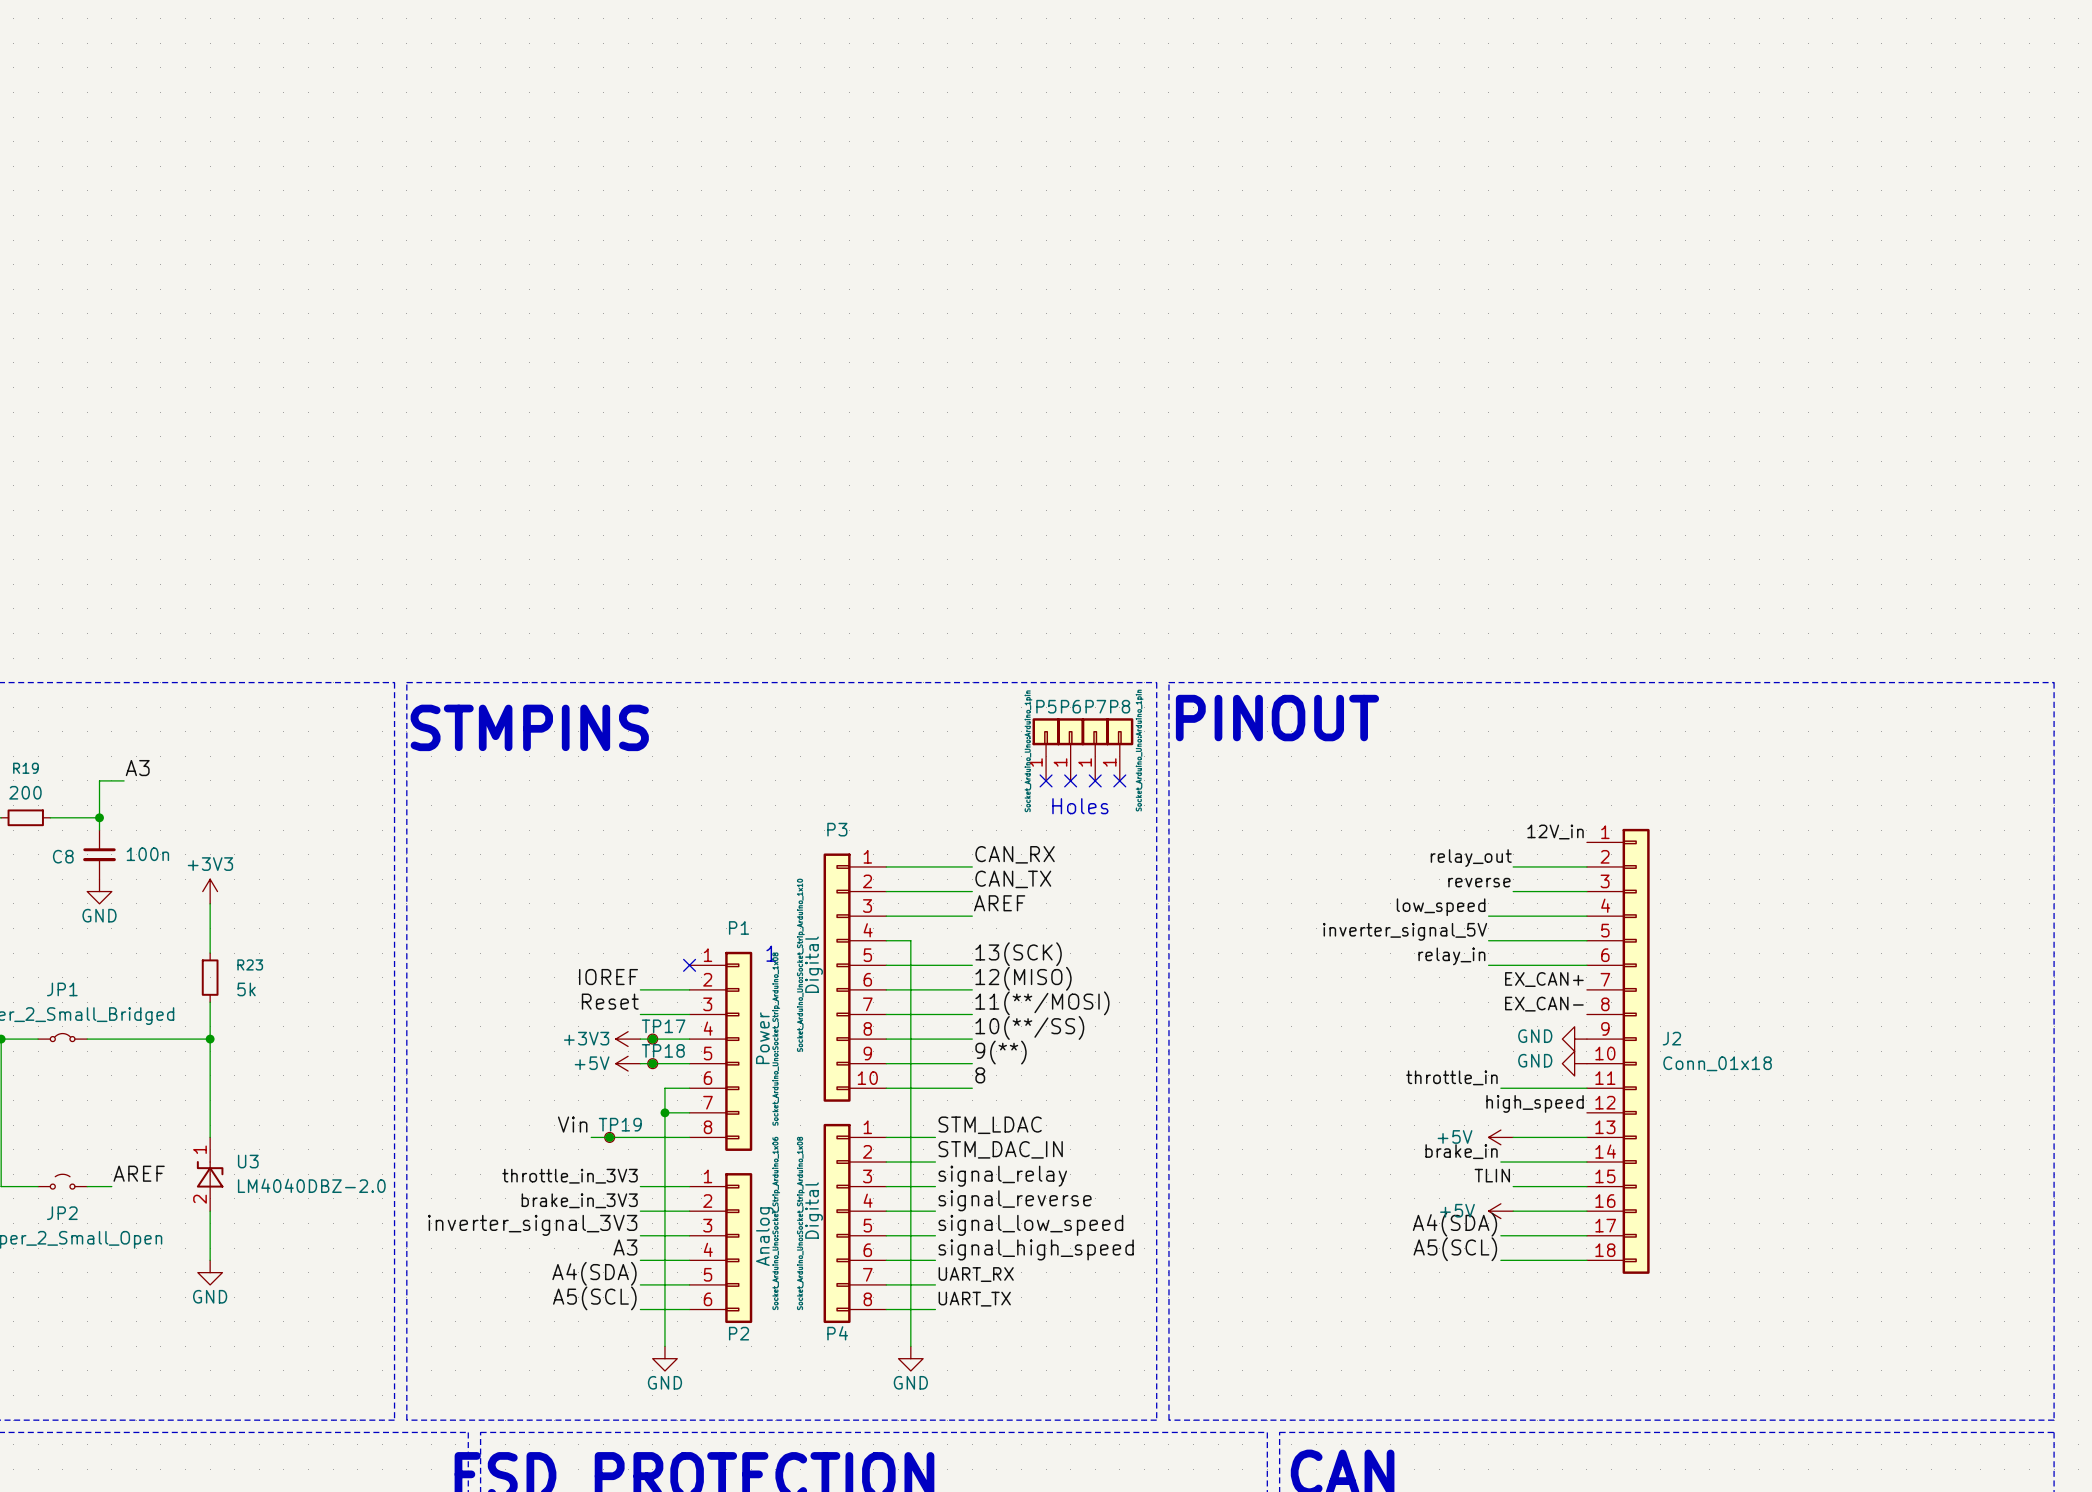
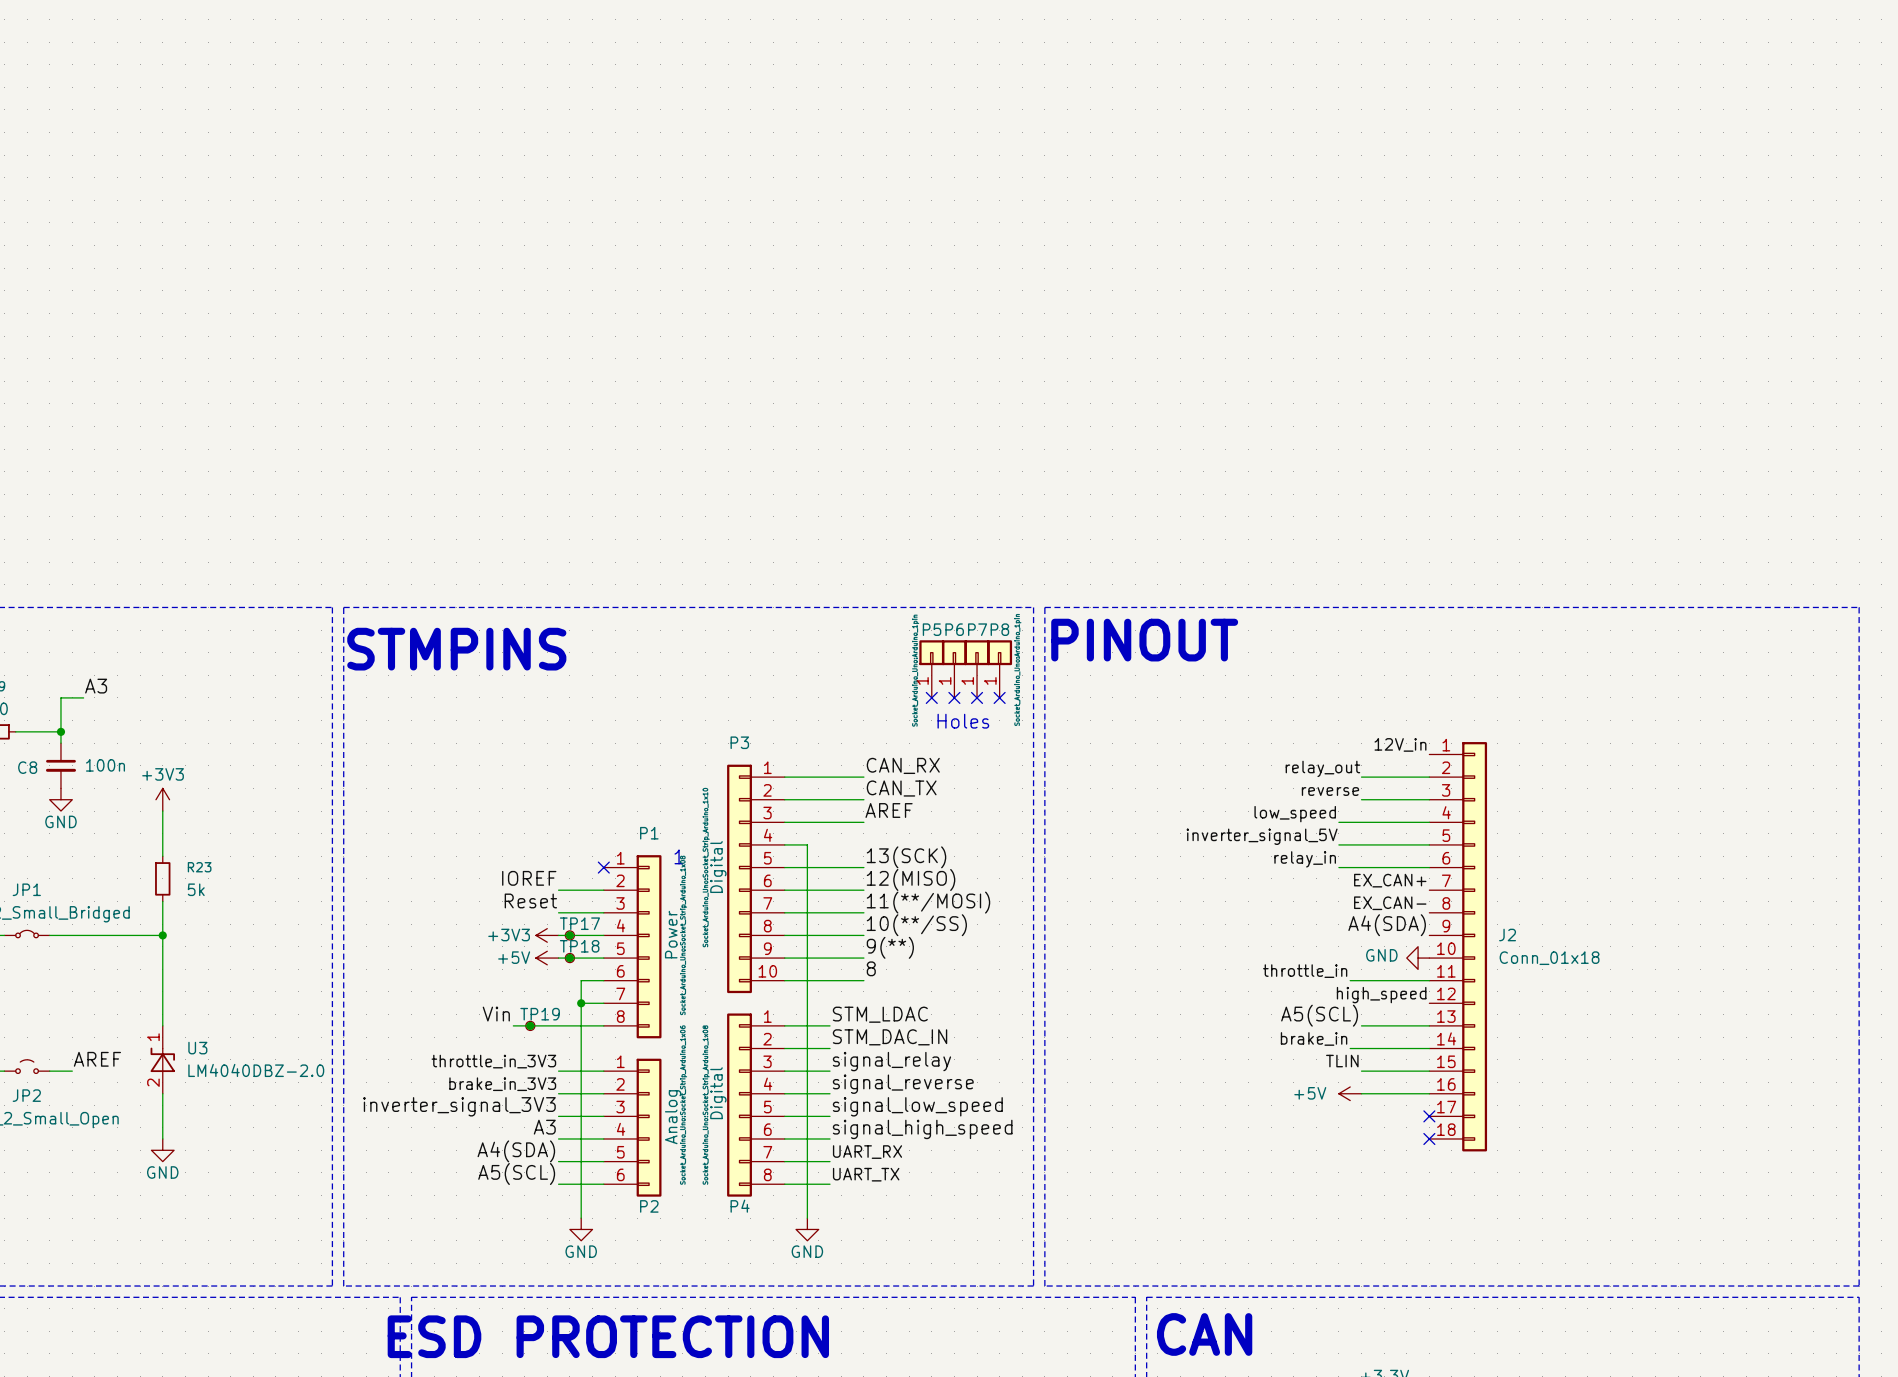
power symbol: GND (1574, 1039) -> none
power symbol: +5V (1500, 1137) -> none
label position: A4(SDA) (1454, 1224) -> A4(SDA) (1387, 925)
wire: (1500, 1235) (1586, 1235) -> none
no-connect mark: none -> (1429, 1116)
label position: A5(SCL) (1455, 1249) -> A5(SCL) (1319, 1015)
wire: (1500, 1260) (1586, 1260) -> none
no-connect mark: none -> (1429, 1138)

